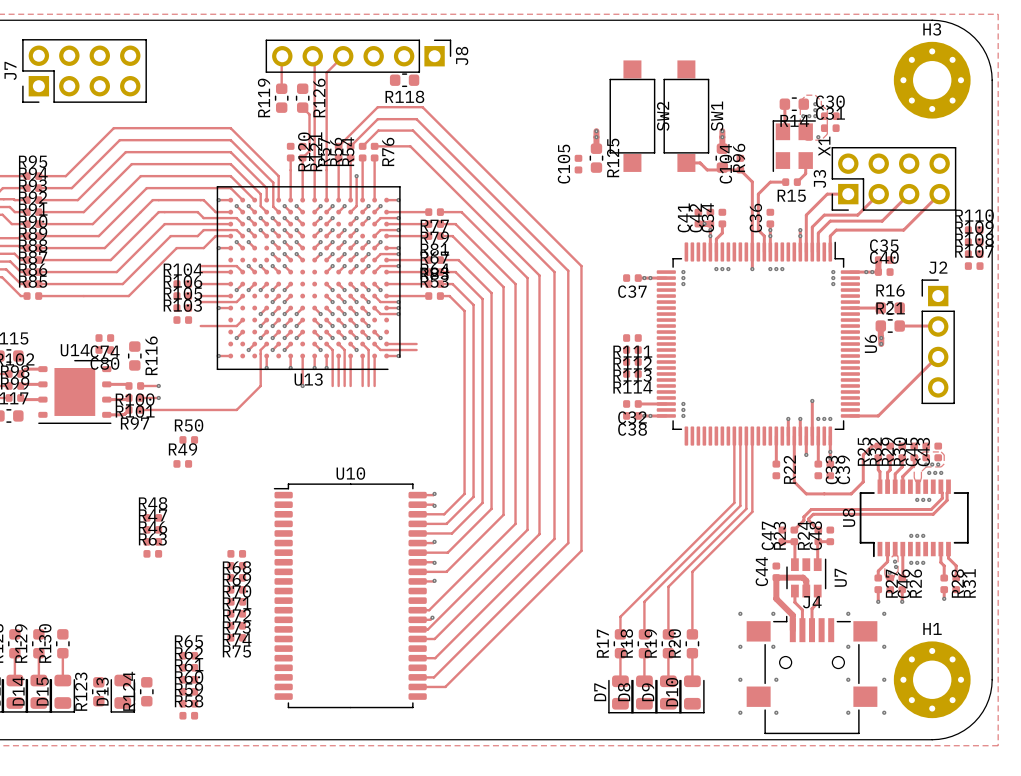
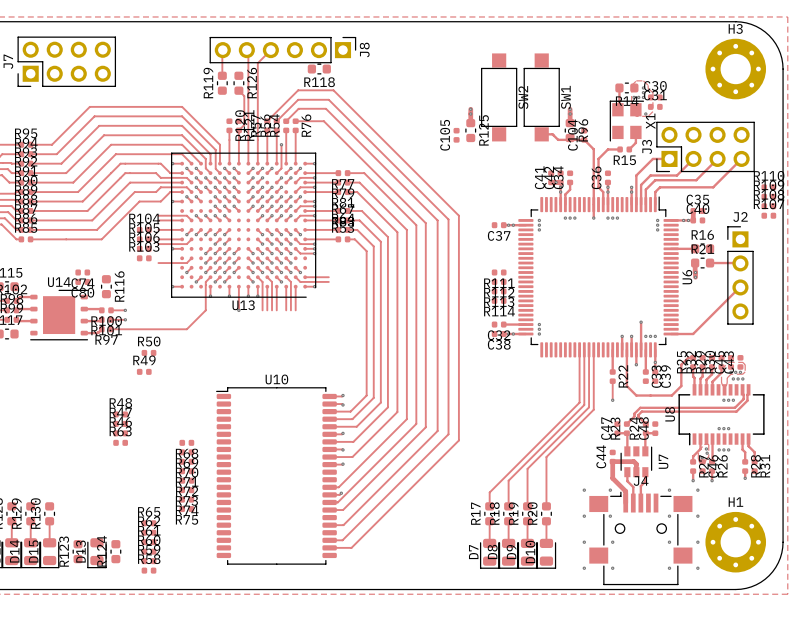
R106 name: R106 (182, 281) -> R105 (144, 227)
R105 name: R105 (182, 293) -> R106 (144, 237)
track: none -> (612, 381) (612, 400)
via: none -> (612, 400)

